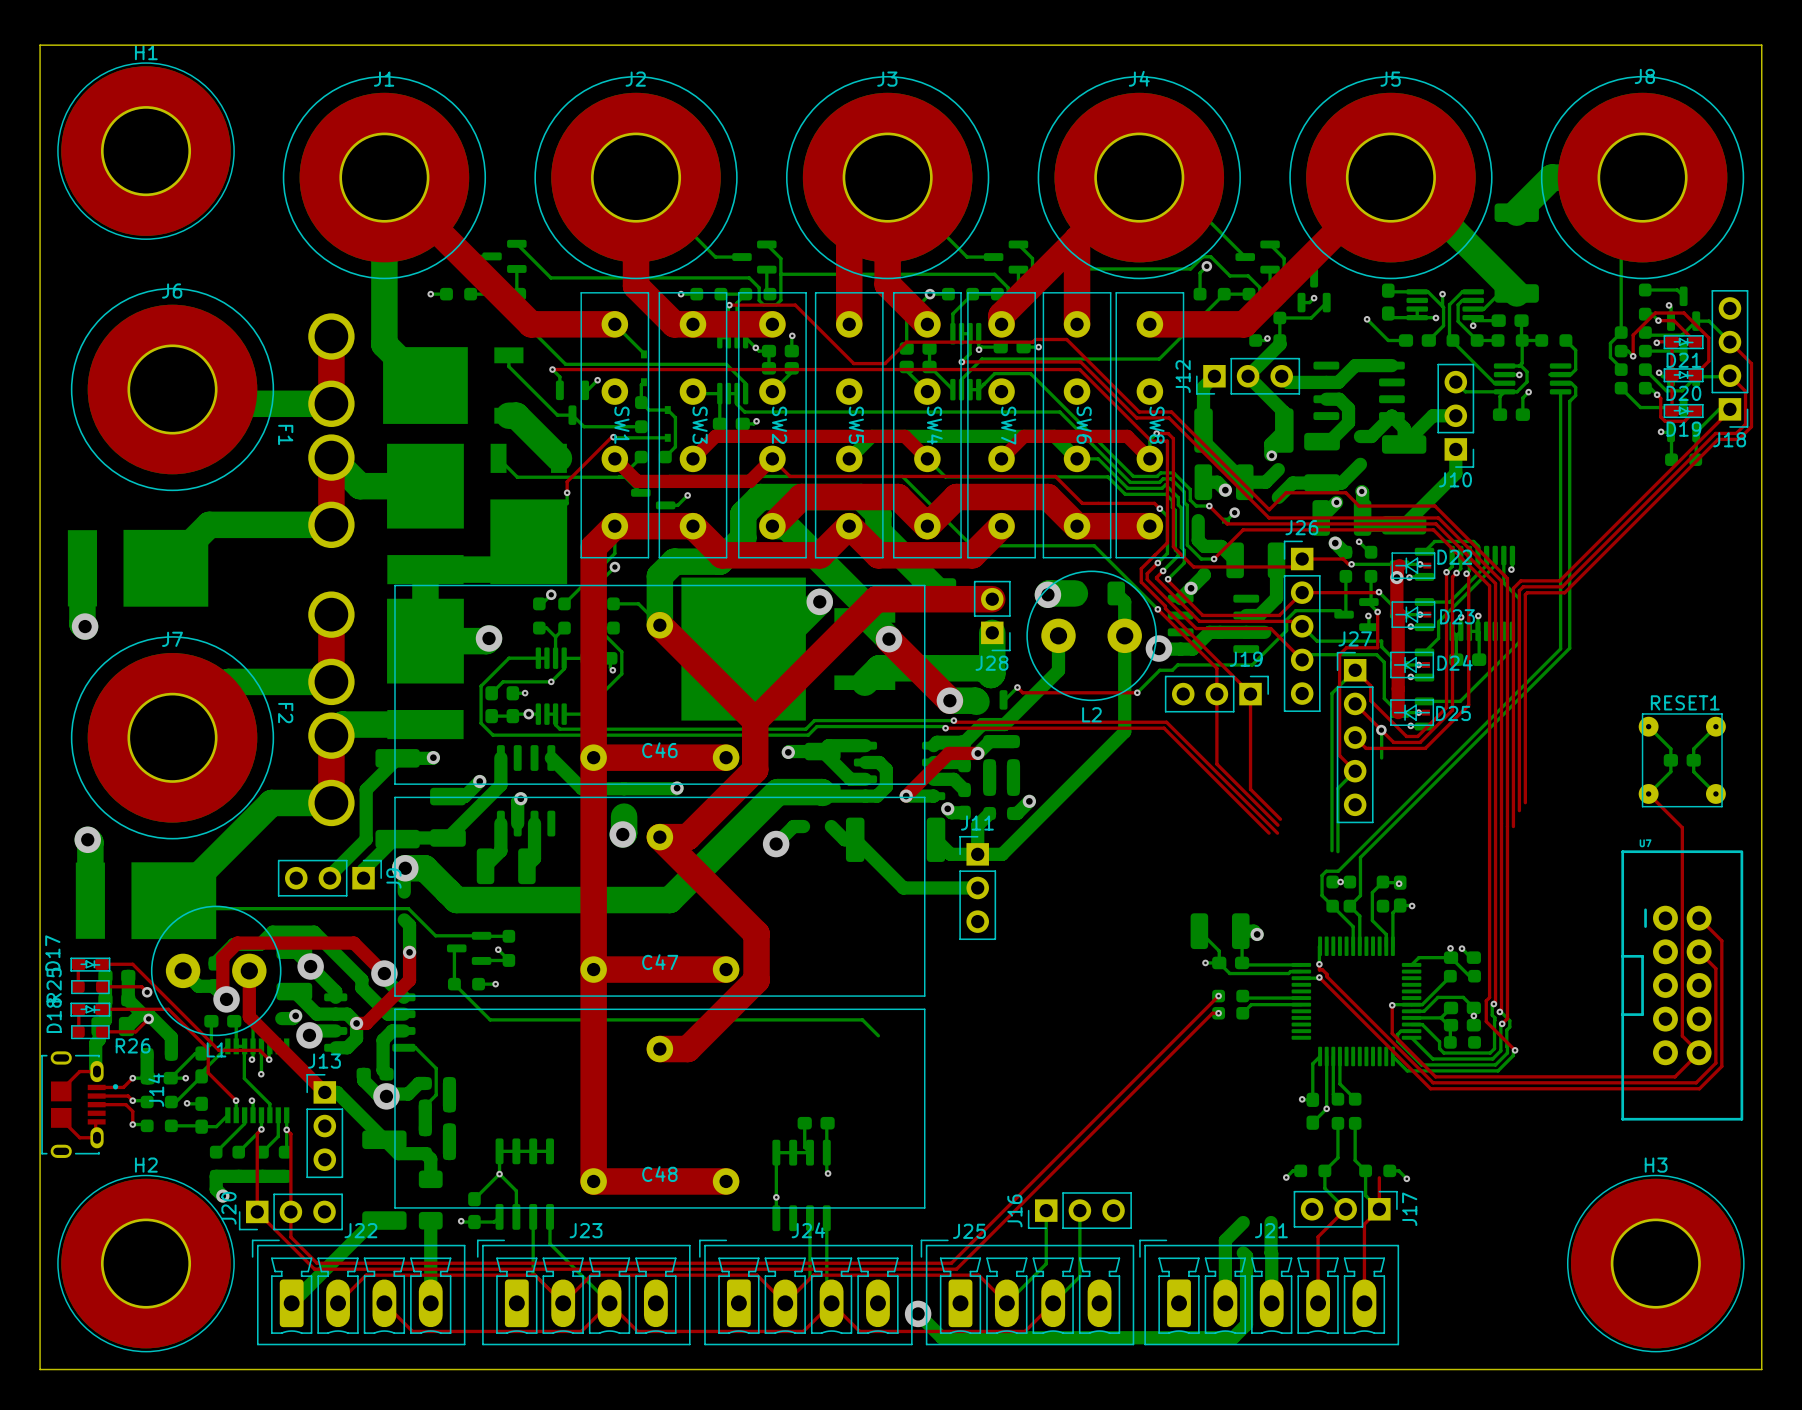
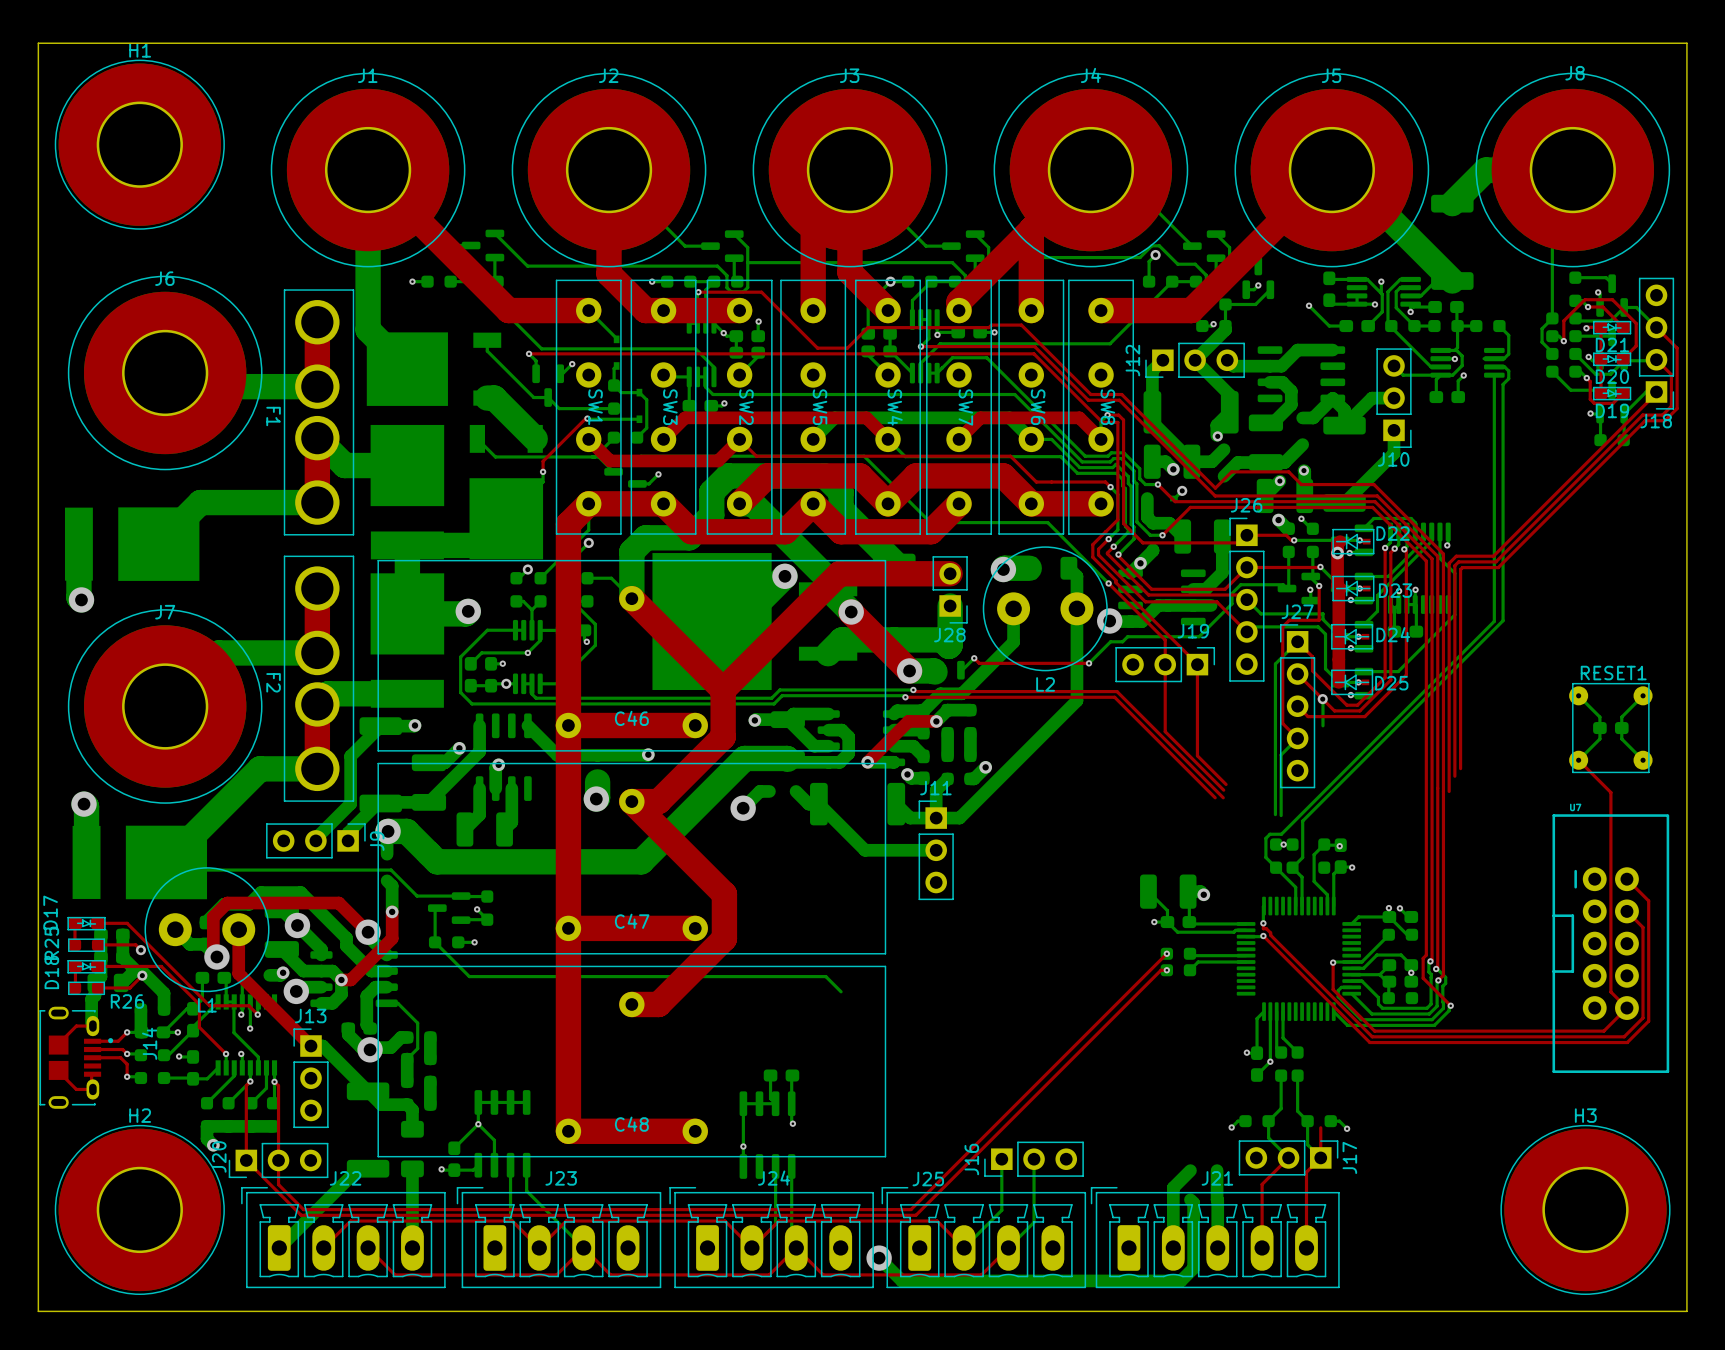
F1 footprint: [308, 313, 355, 549] -> [283, 289, 355, 536]
F2 footprint: [308, 591, 355, 827] -> [283, 555, 355, 802]

